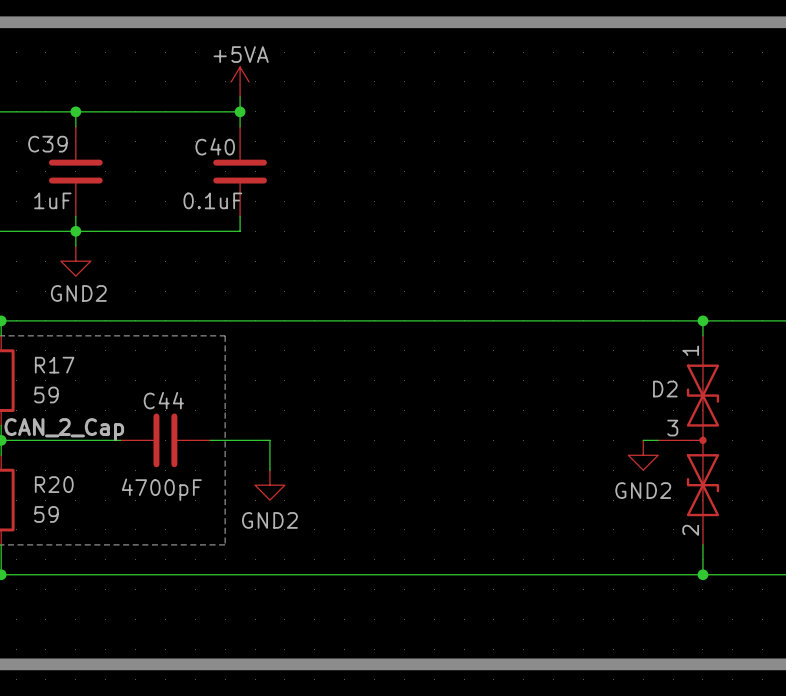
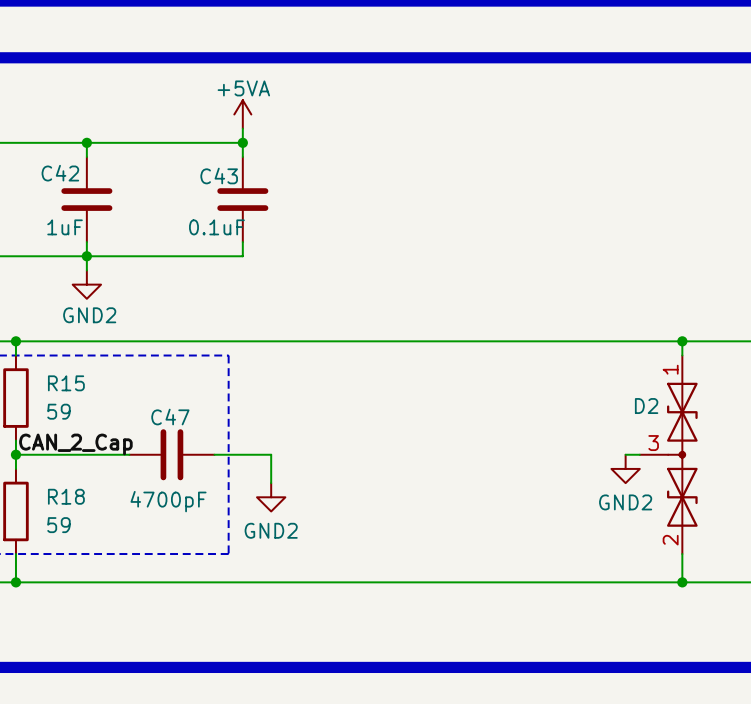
C39 name: C39 (47, 144) -> C42 (60, 173)
C40 name: C40 (215, 146) -> C43 (219, 176)
R17 name: R17 (54, 365) -> R15 (66, 383)
C44 name: C44 (163, 400) -> C47 (170, 417)
R20 name: R20 (54, 484) -> R18 (66, 496)

